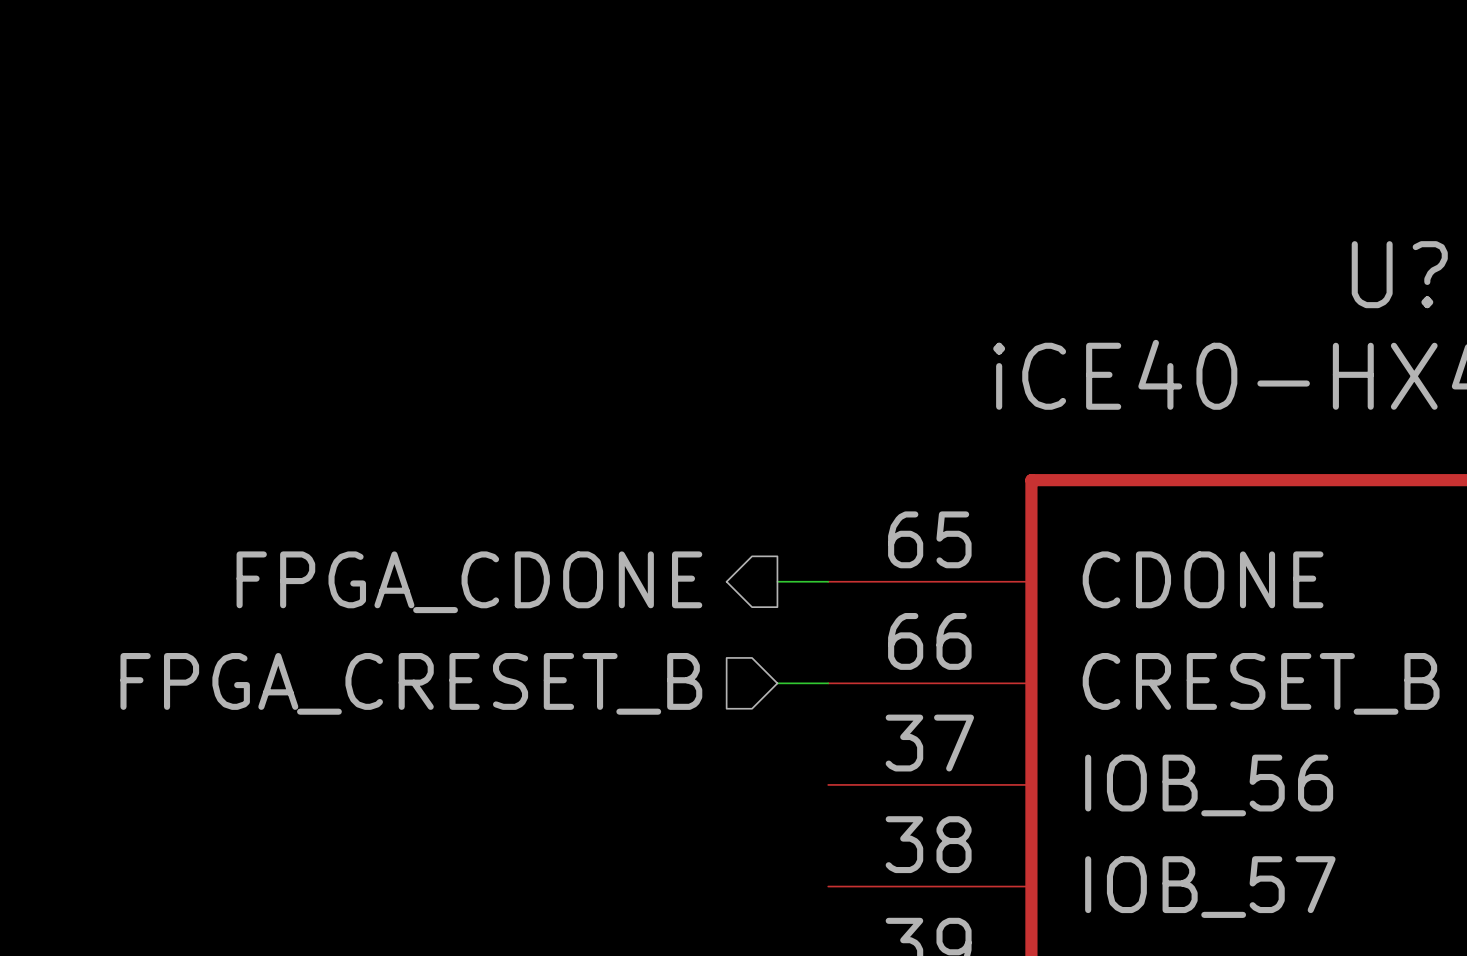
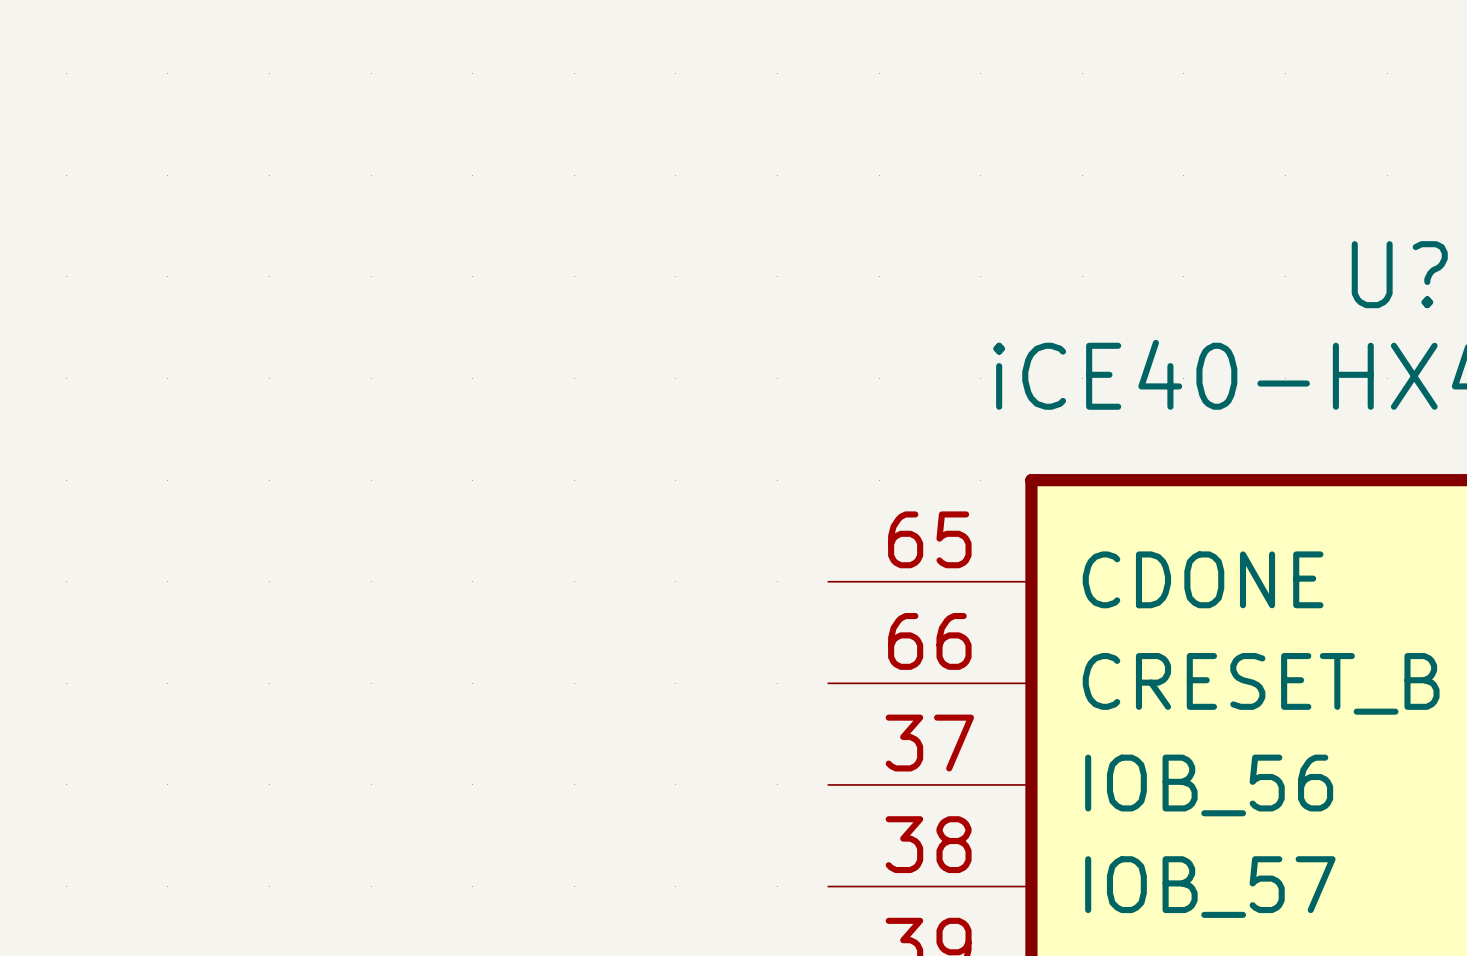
wire: (777, 581) (828, 581) -> none
hierarchical label: FPGA_CDONE (469, 582) -> none
hierarchical label: FPGA_CRESET_B (411, 683) -> none
wire: (777, 683) (828, 683) -> none

